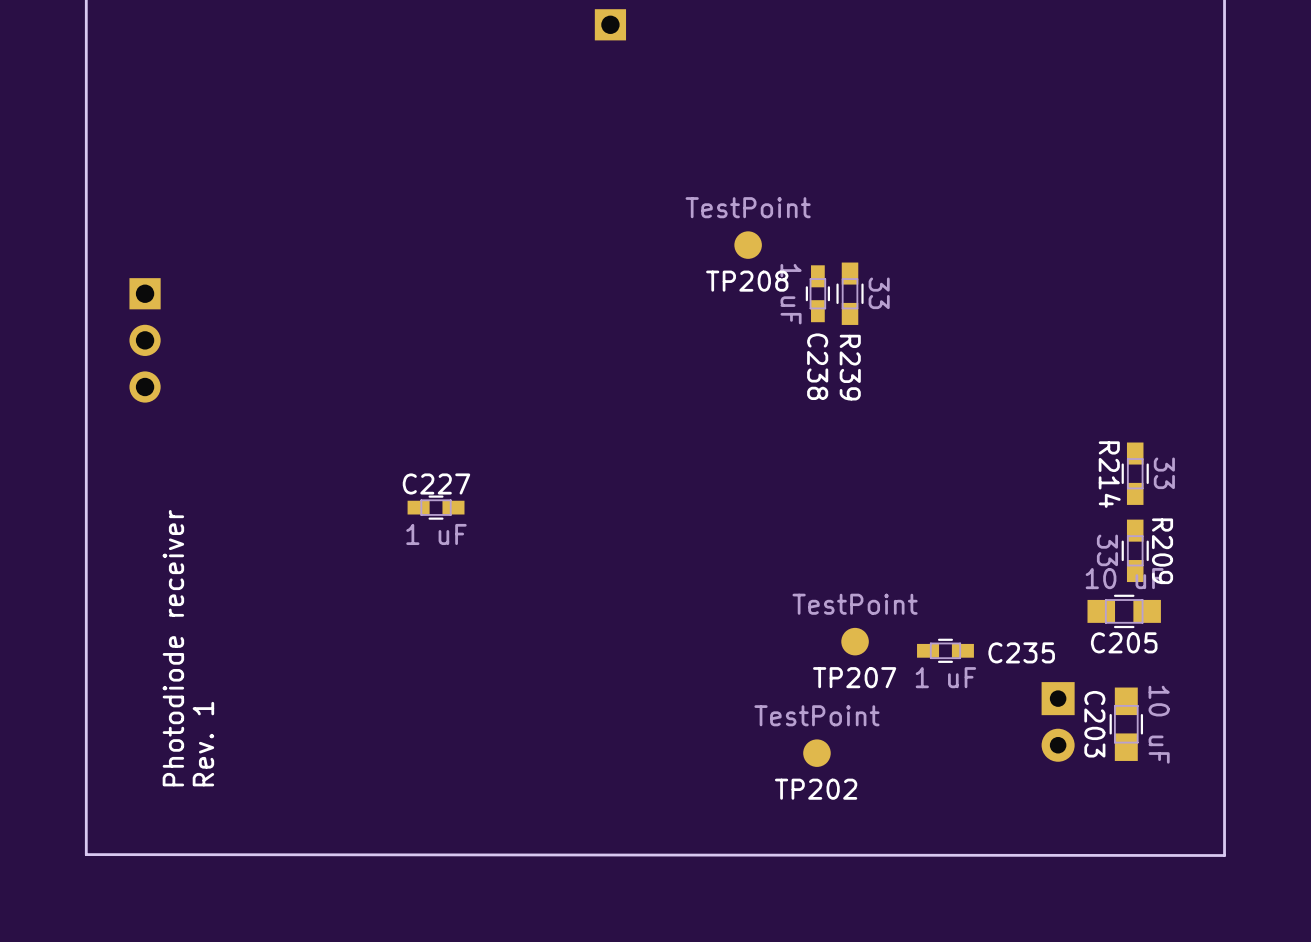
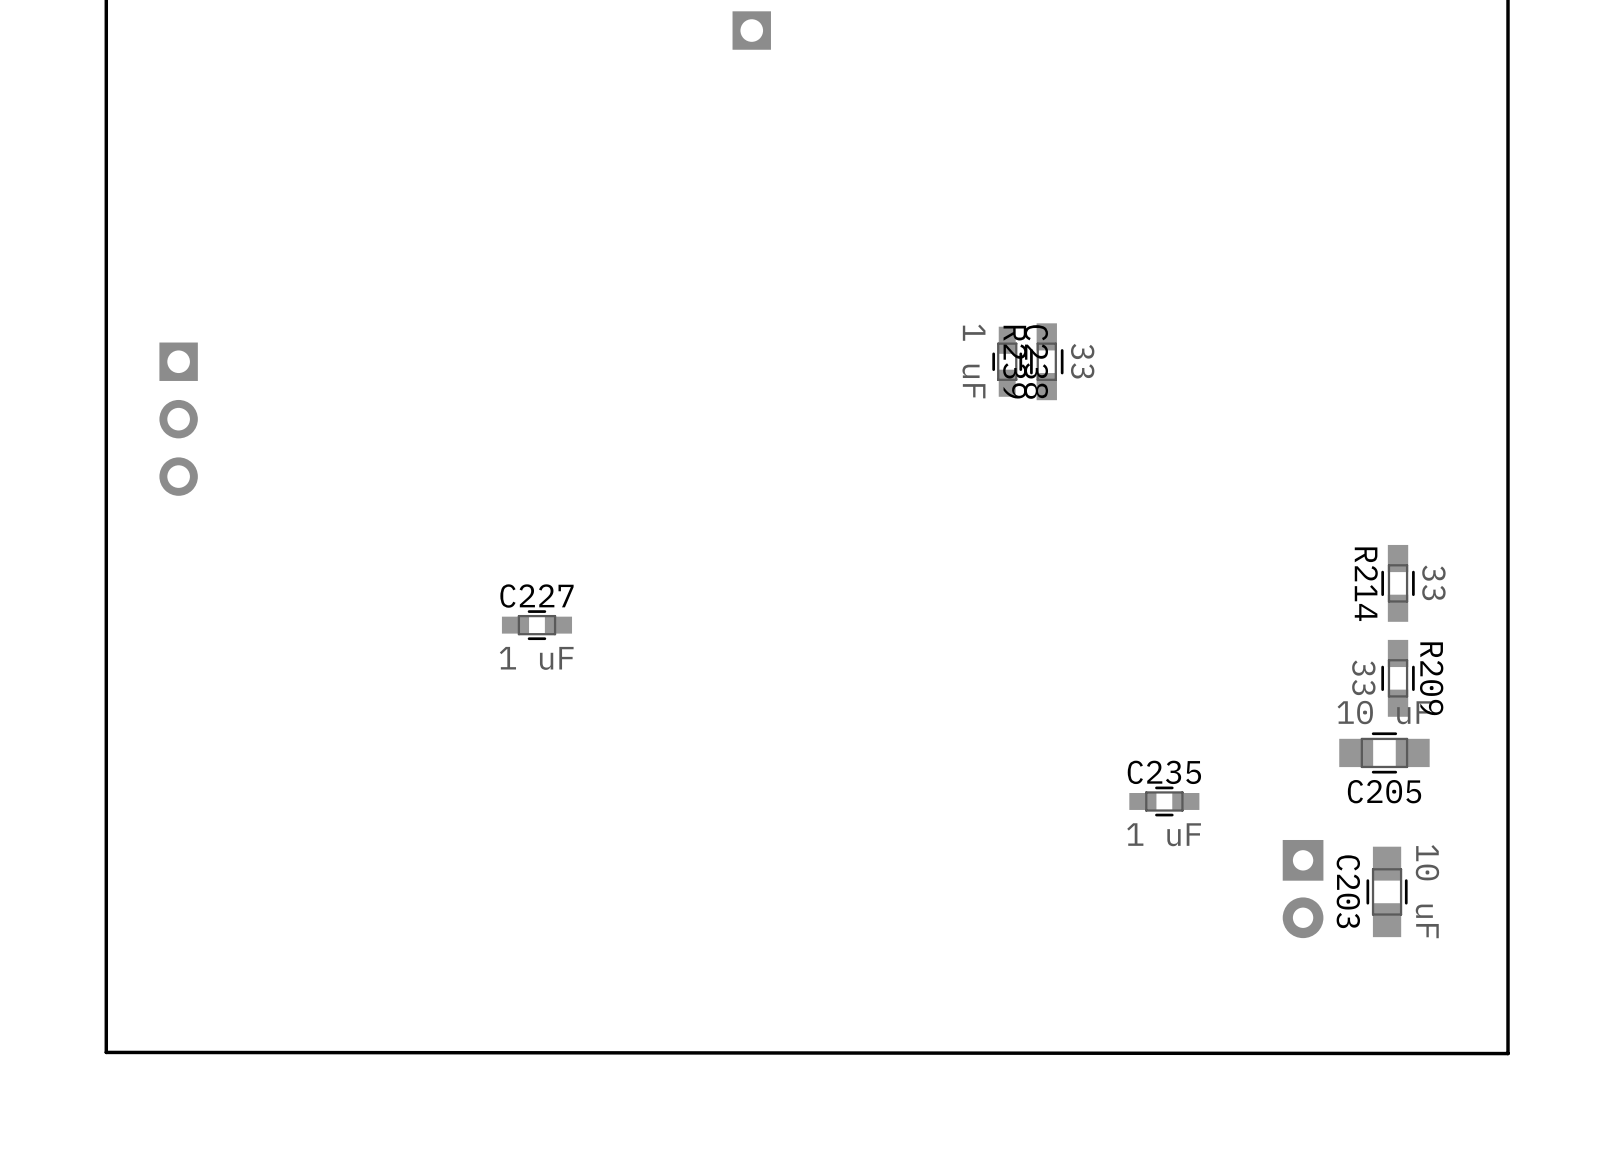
TP208: TestPoint (748, 245) -> none
C238 name position: C238 (817, 366) -> C238 (1036, 361)
R239 name position: R239 (850, 367) -> R239 (1014, 362)
TP207: TestPoint (855, 641) -> none
text: Photodiode receiver (173, 648) -> none
C235 name position: C235 (1021, 652) -> C235 (1164, 772)
text: Rev. 1 (203, 744) -> none
TP202: TestPoint (816, 753) -> none

